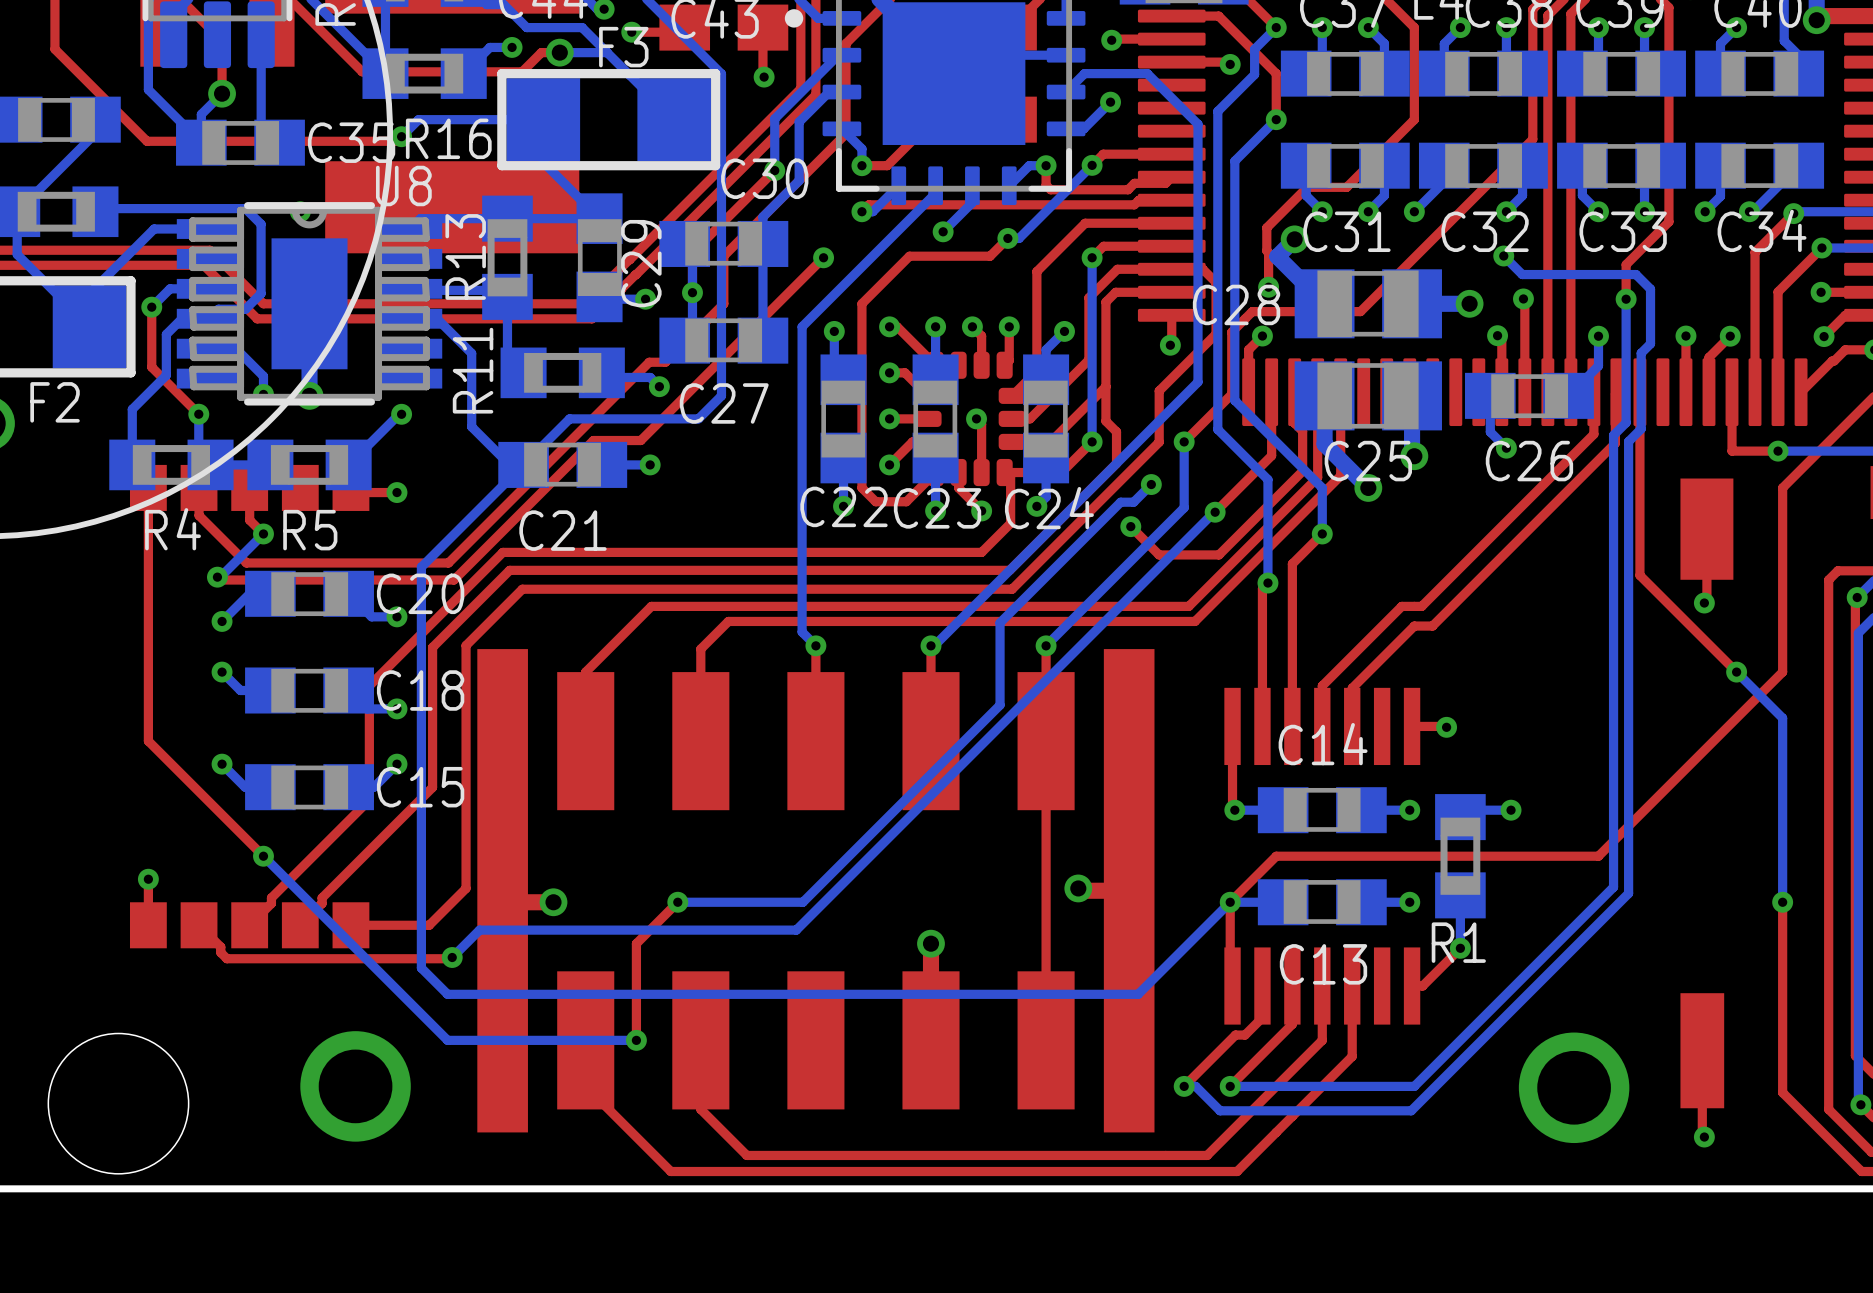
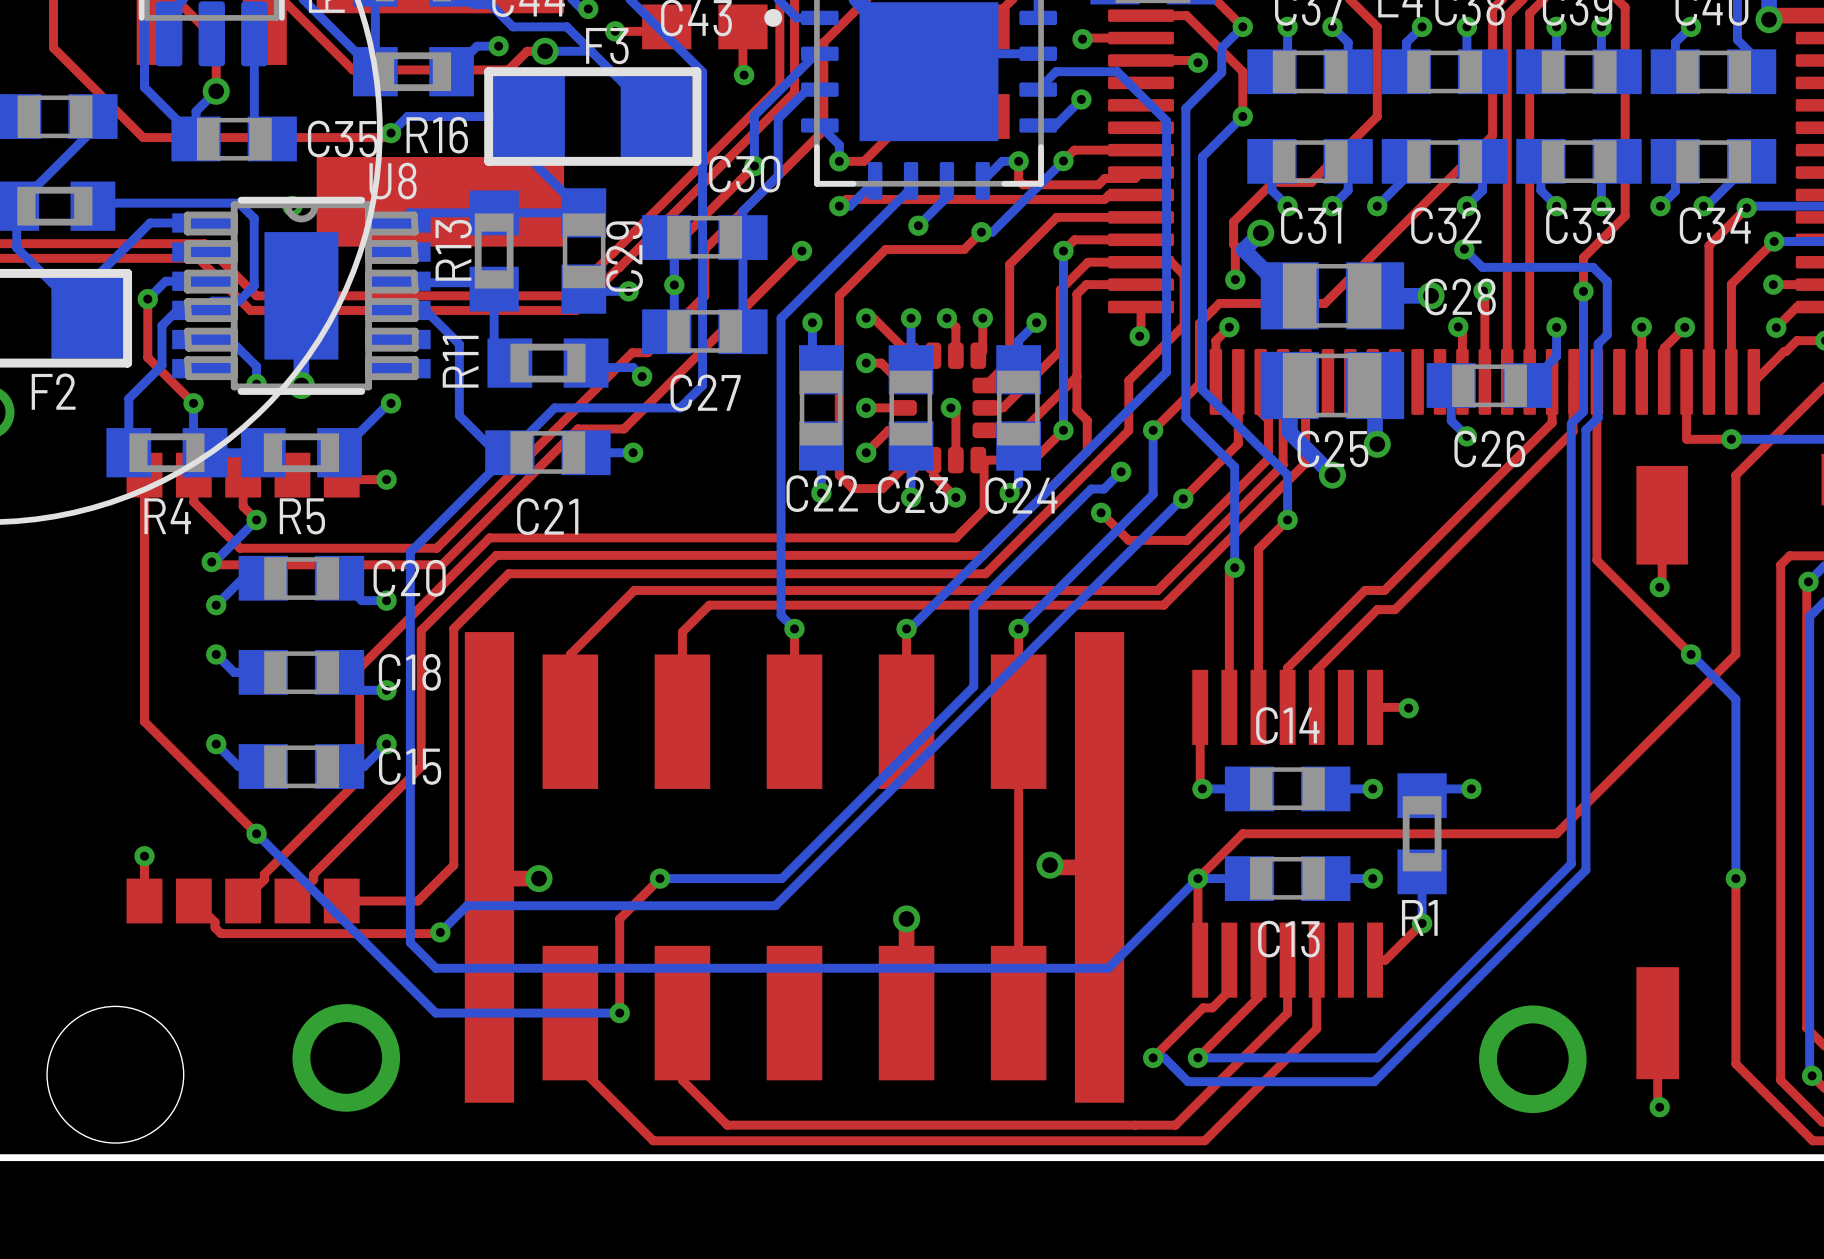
C28 name position: C28 (1236, 304) -> C28 (1460, 296)

